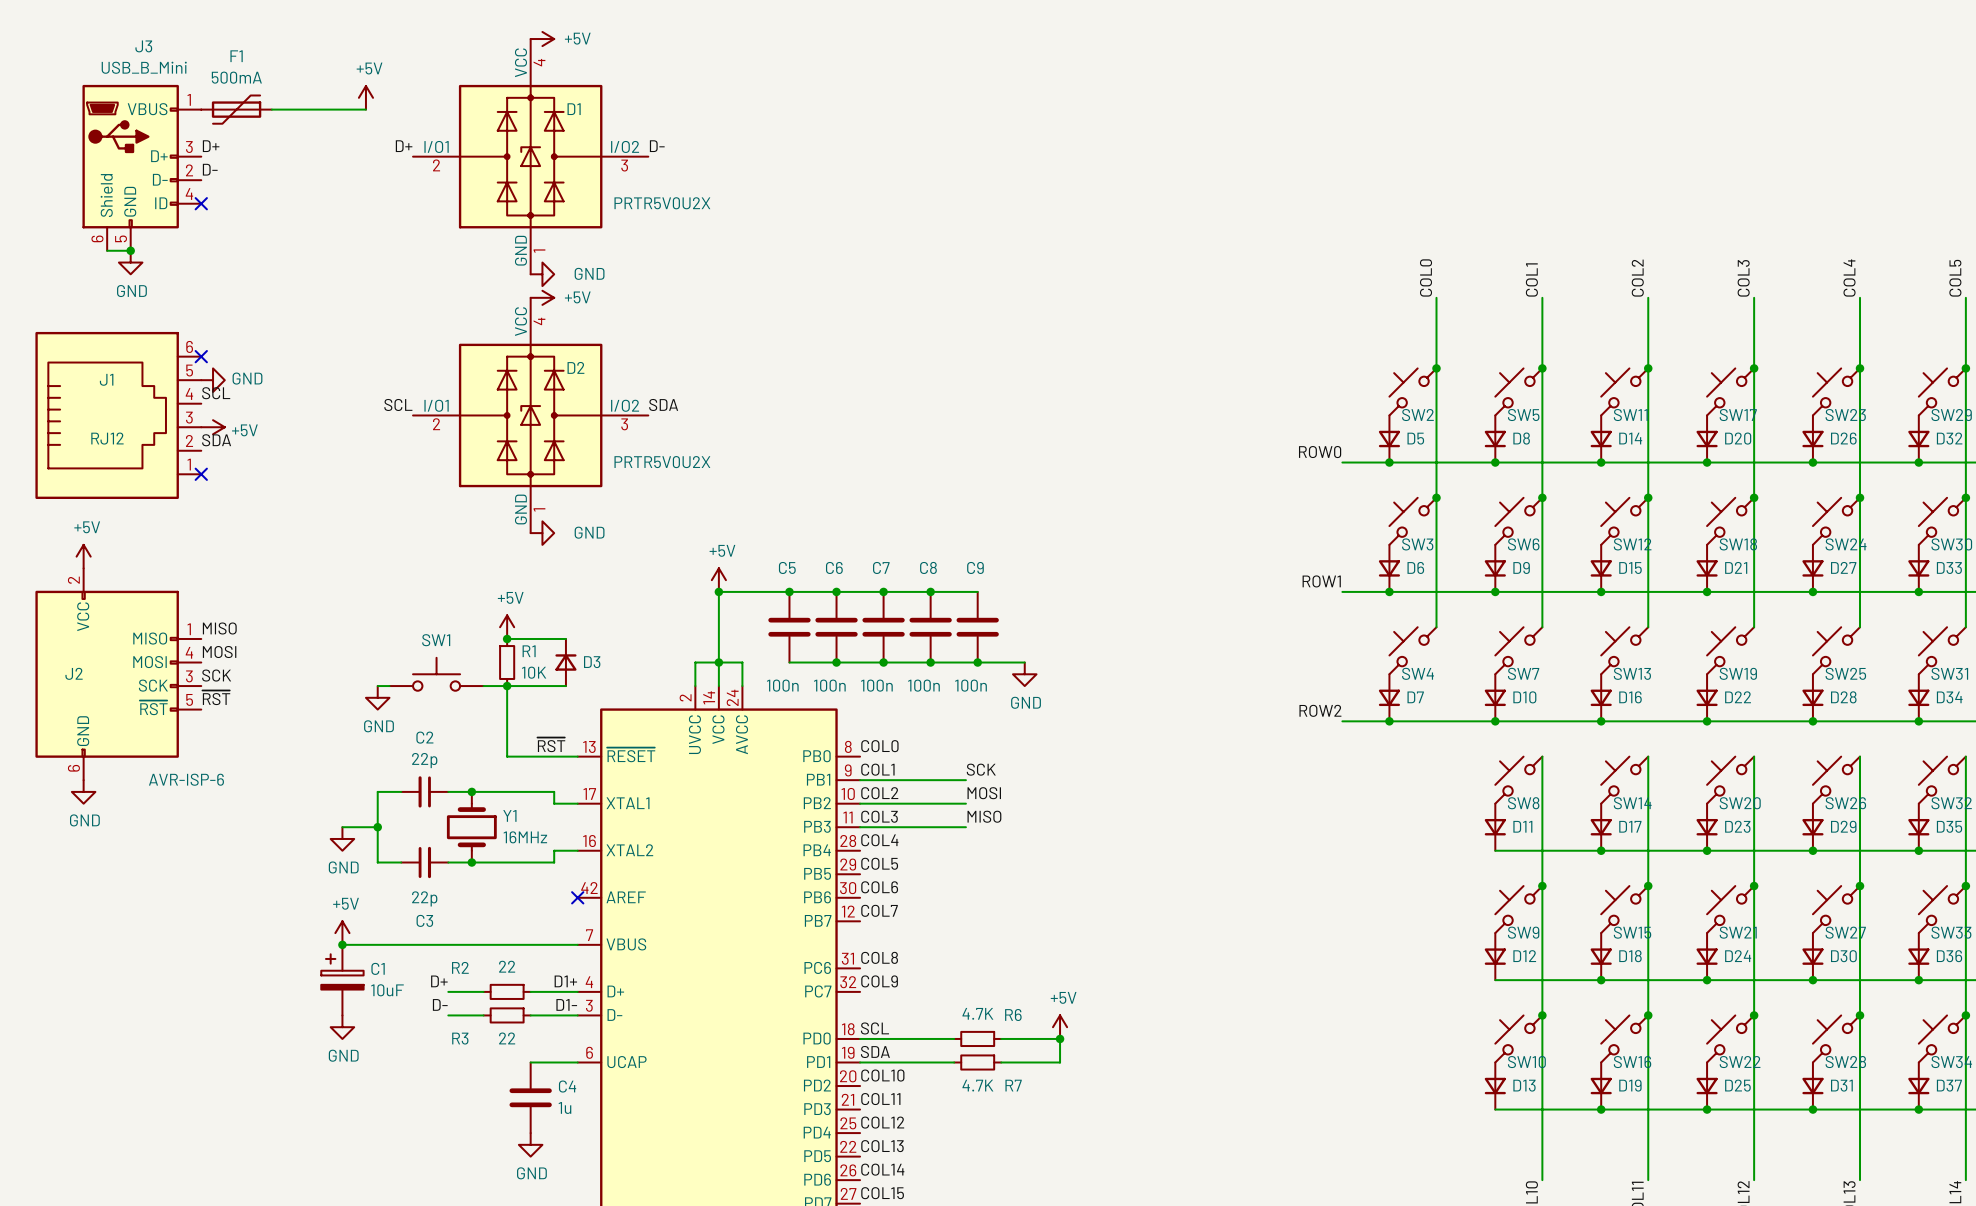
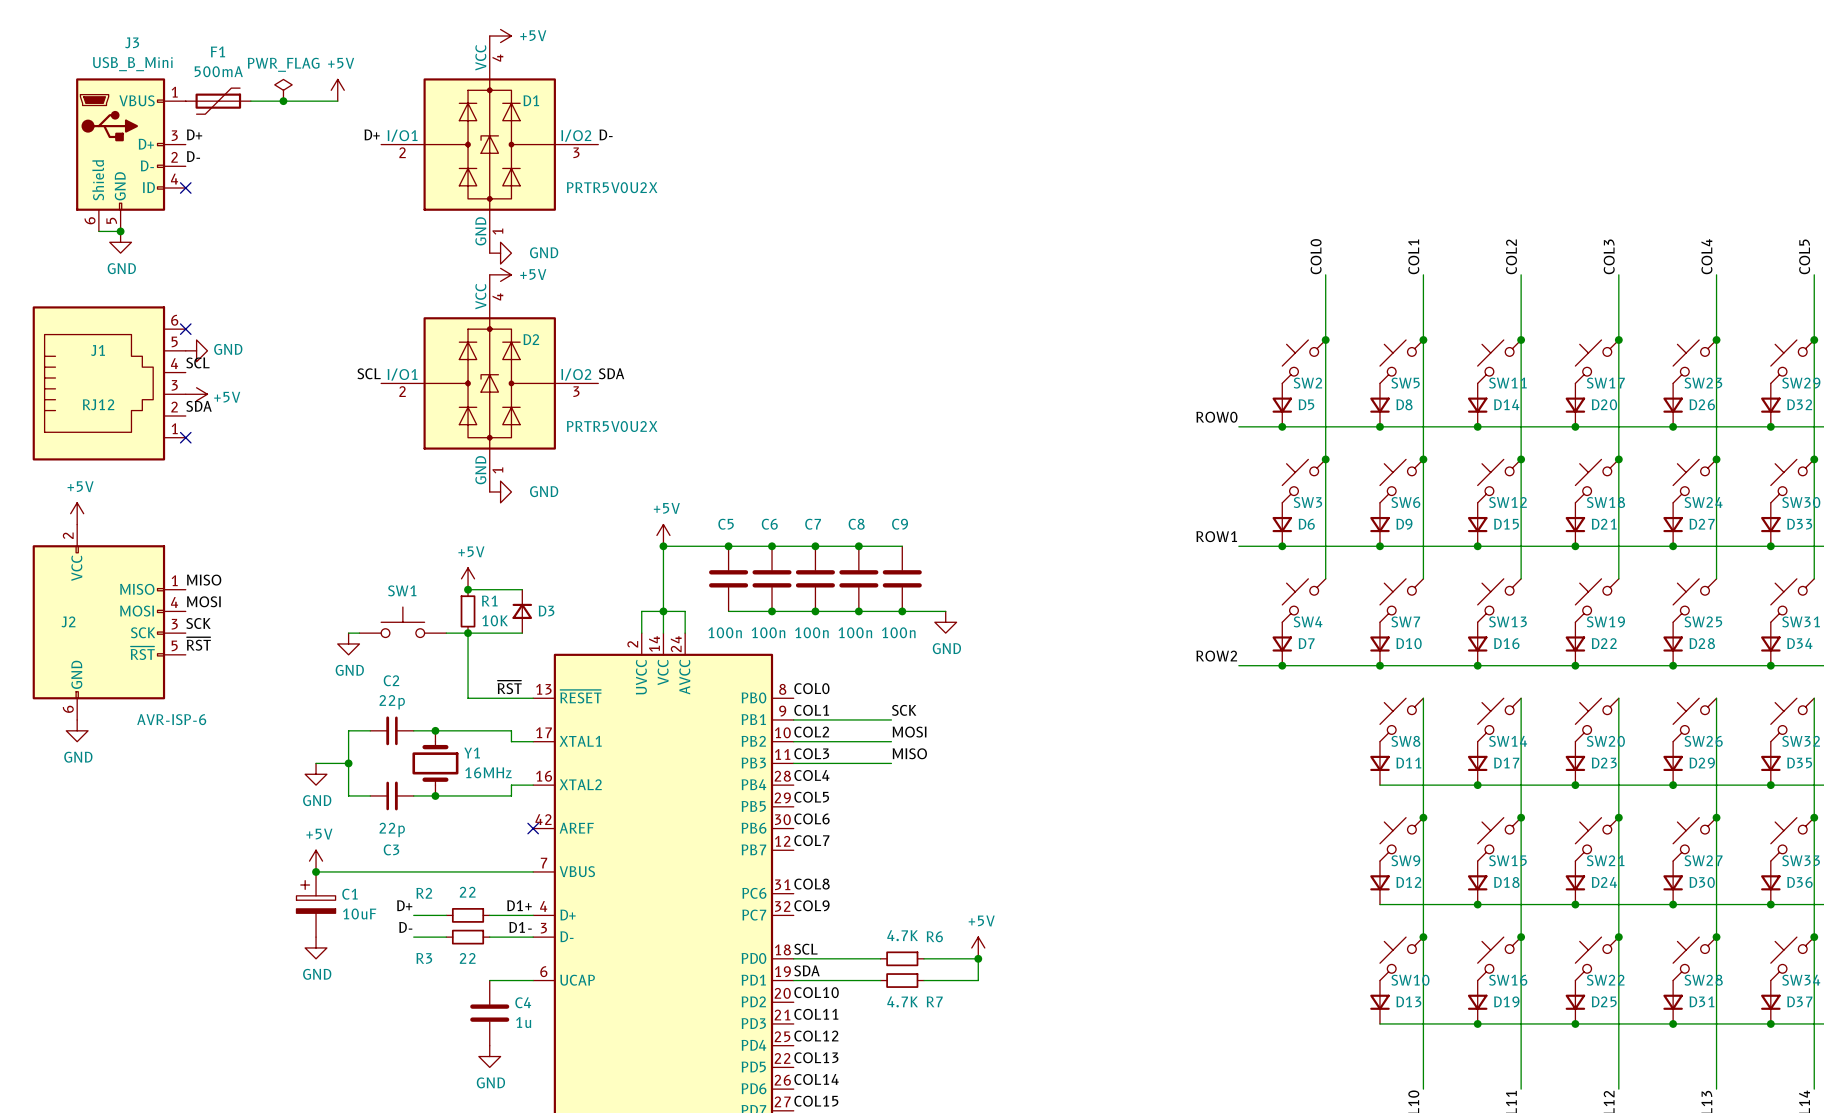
power symbol: none -> PWR_FLAG (283, 90)
junction: none -> (283, 101)

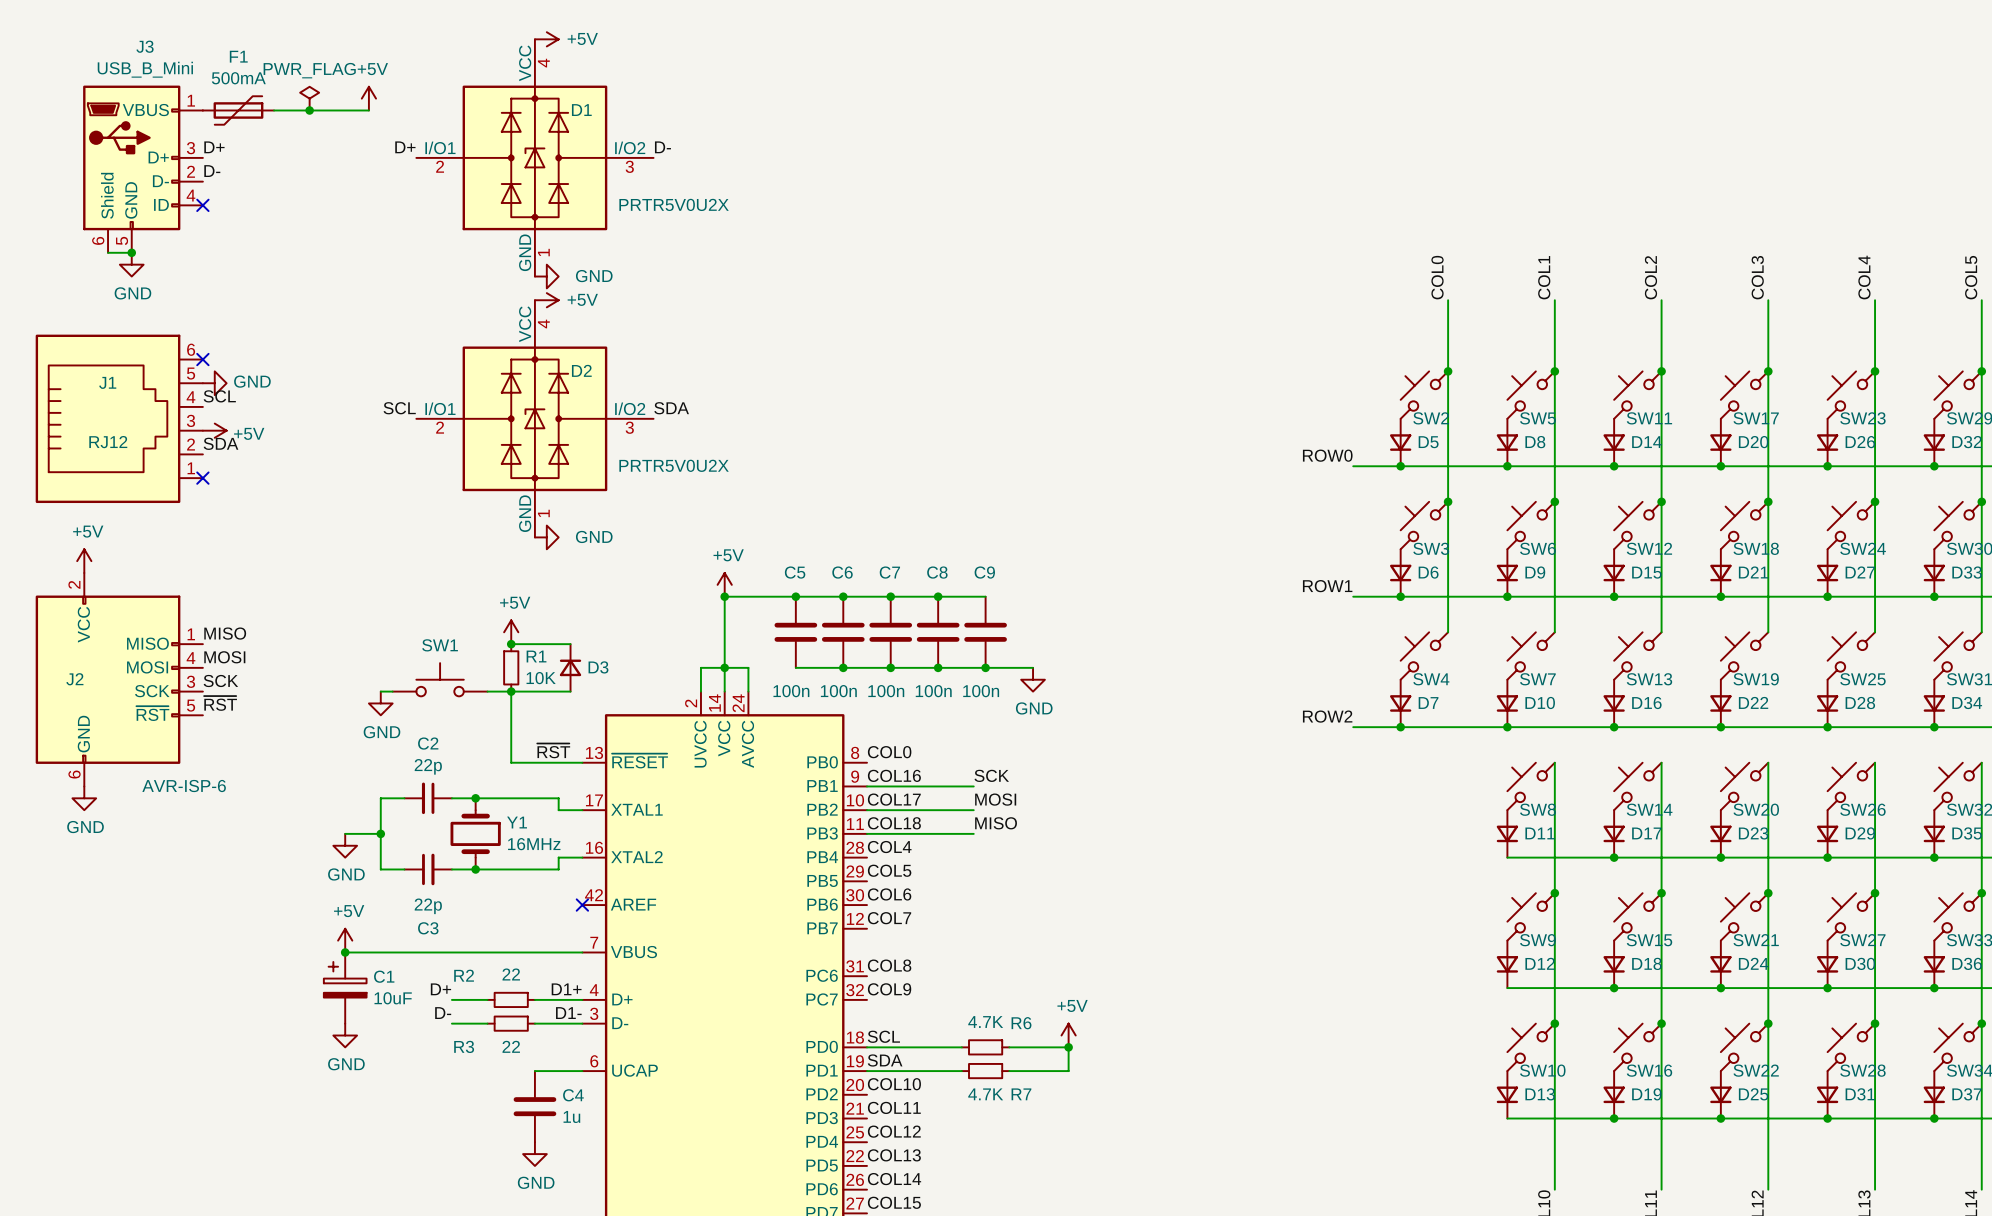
label: COL1 (811, 710) -> COL16 (894, 775)
label: COL2 (811, 732) -> COL17 (894, 799)
label: COL3 (811, 753) -> COL18 (894, 823)

